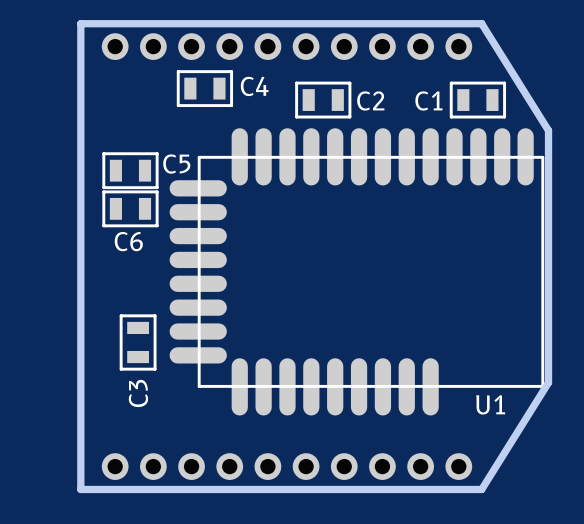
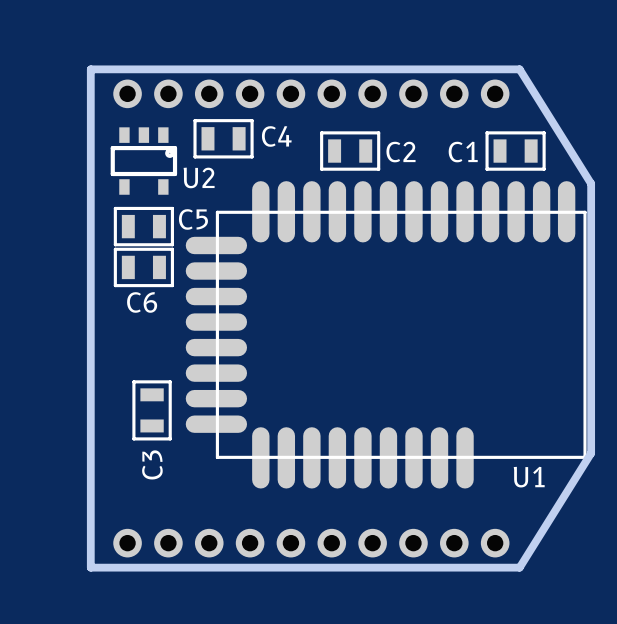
U2: none -> (143, 161)

